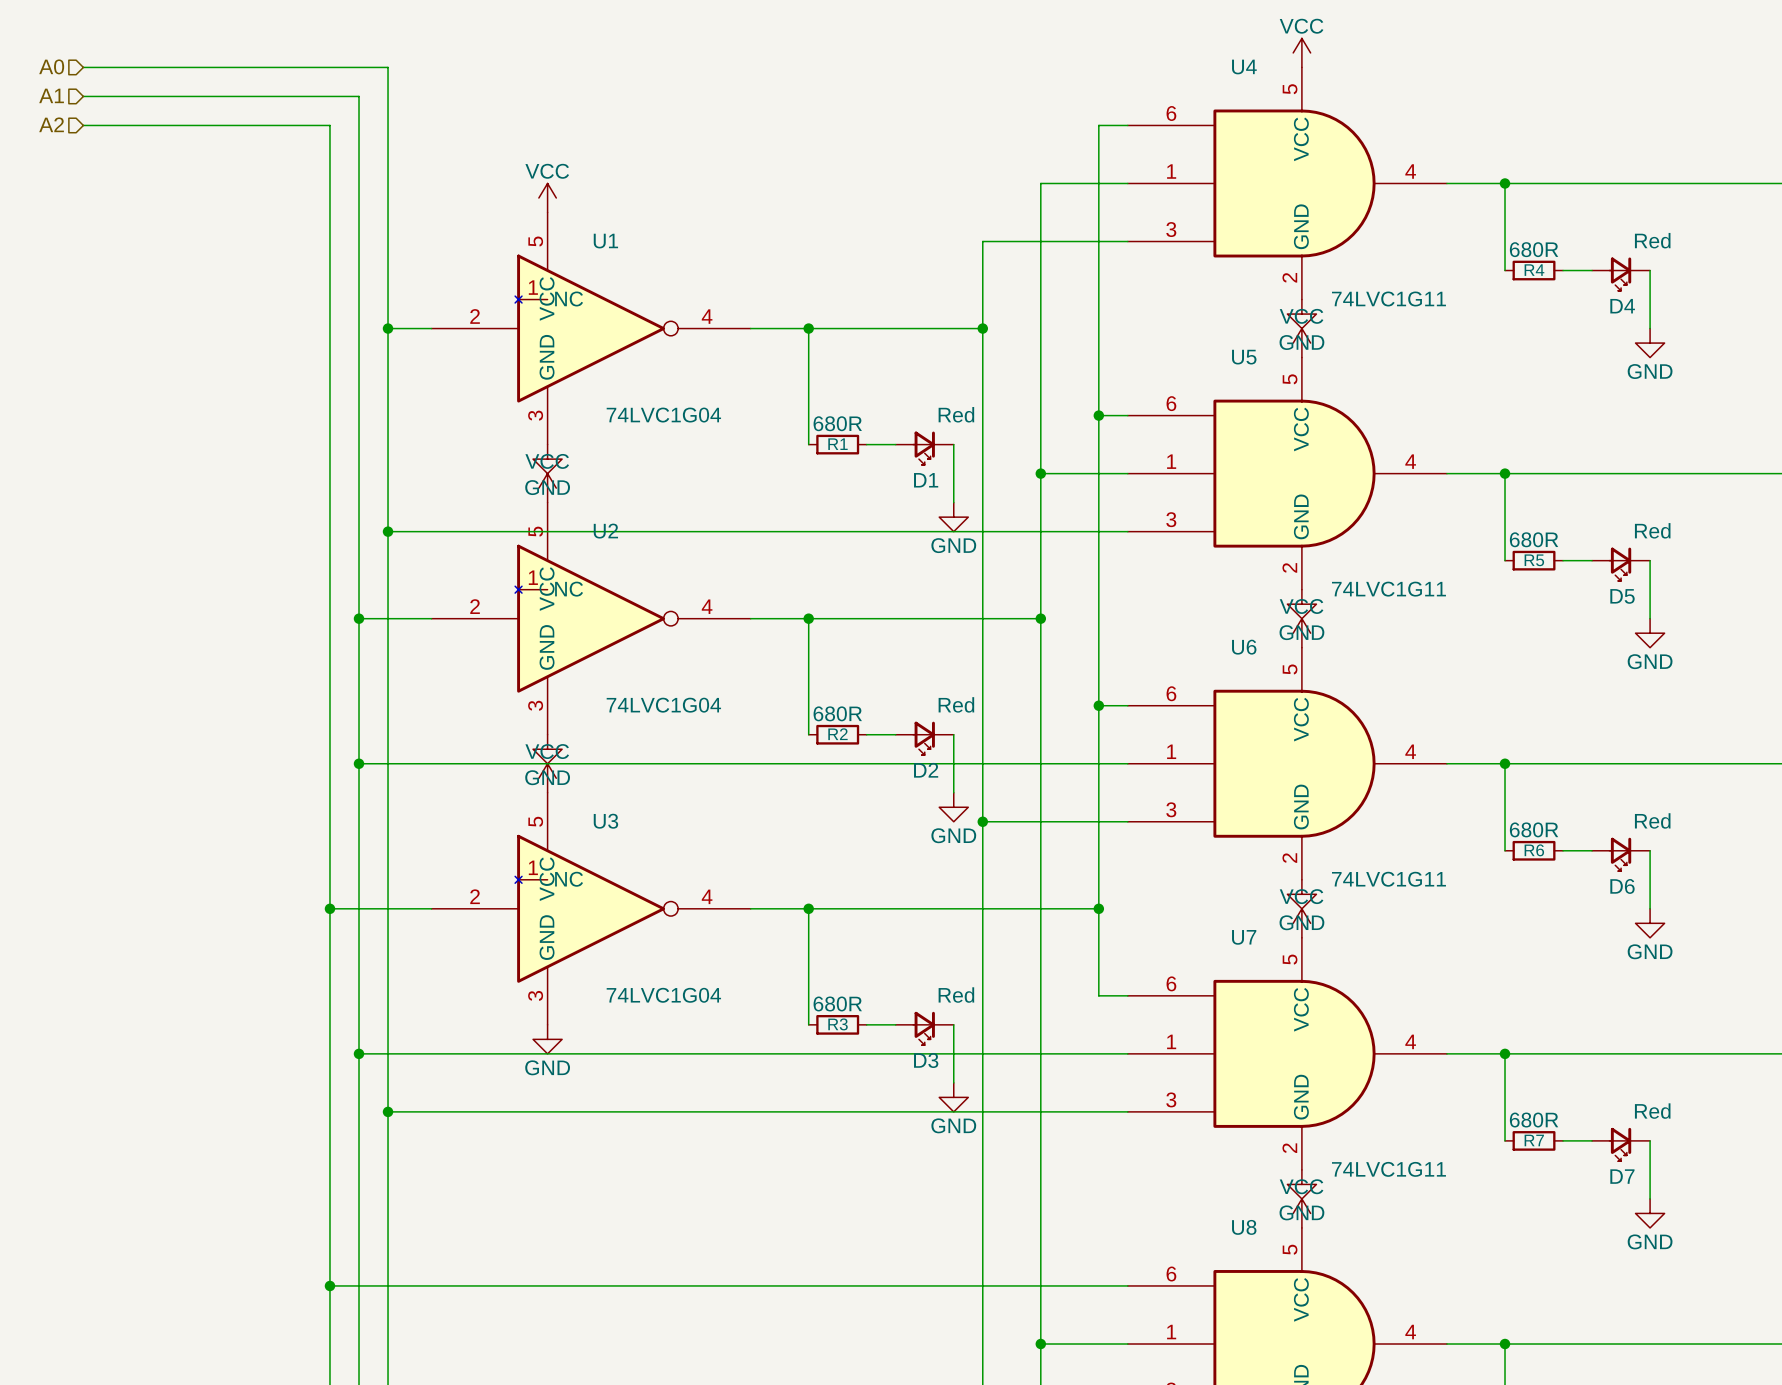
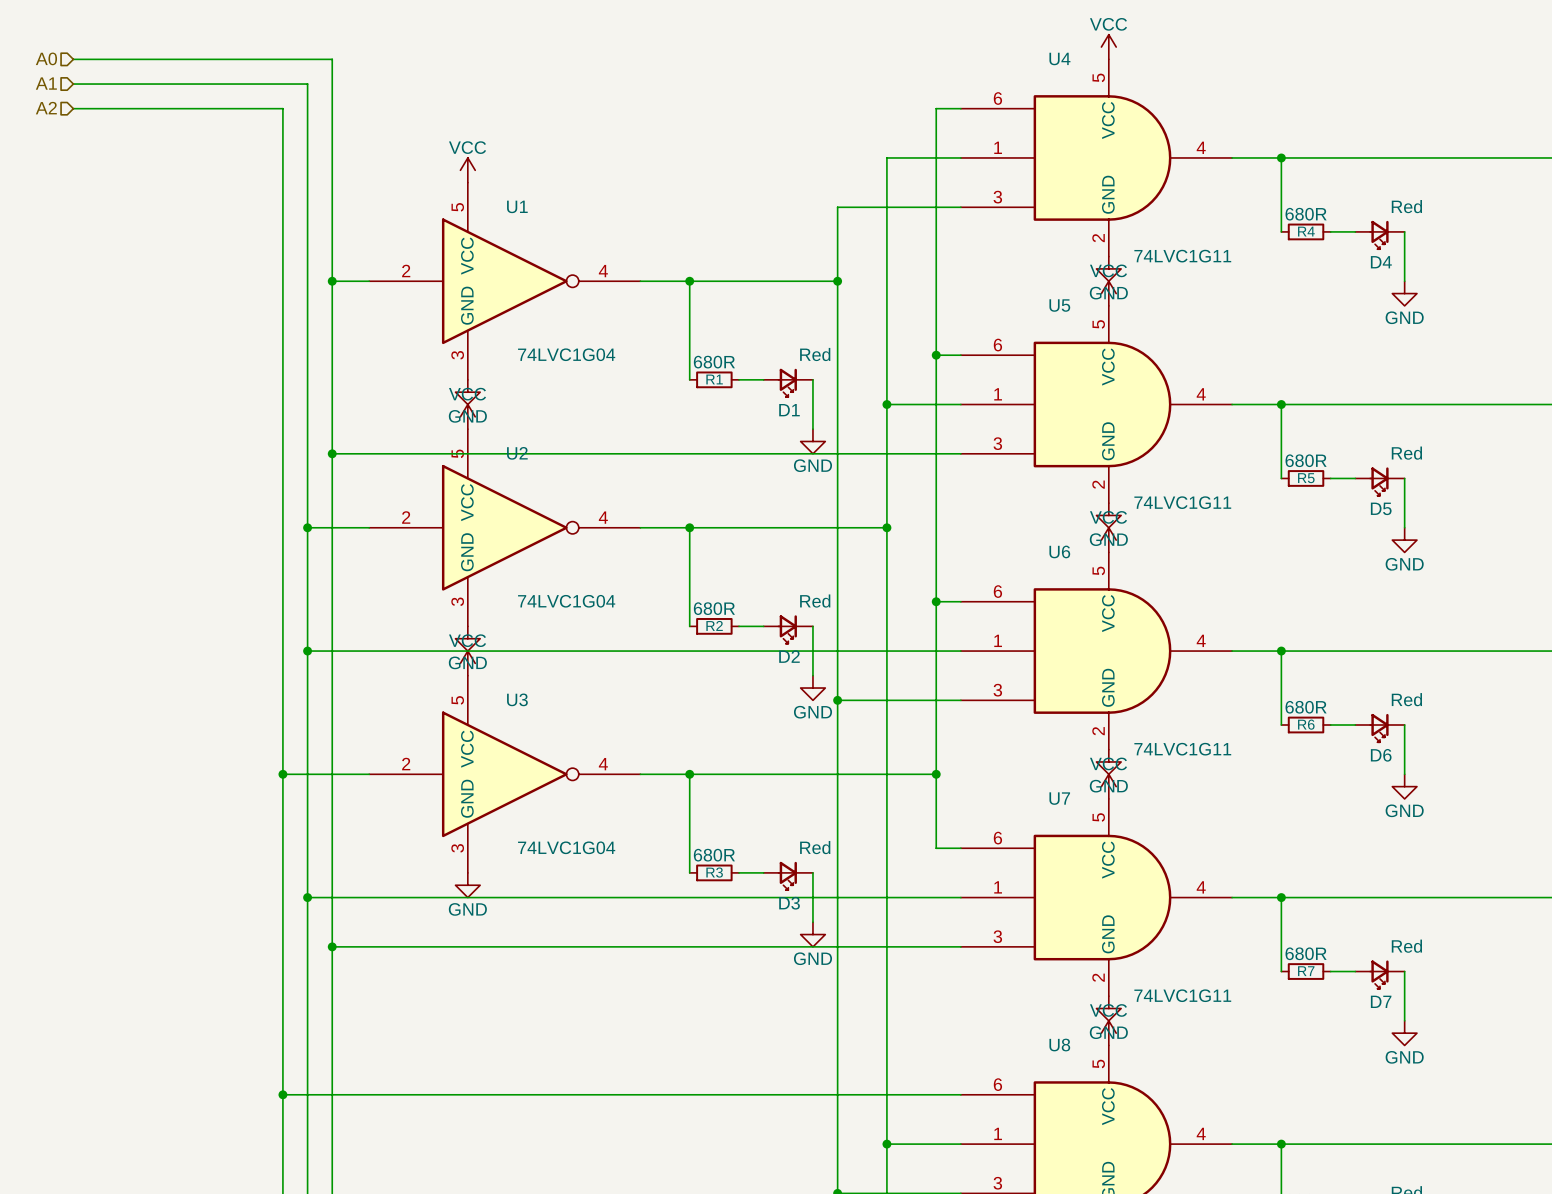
U1 symbol: [431, 212, 751, 445] -> [369, 182, 641, 380]
U2 symbol: [431, 502, 751, 735] -> [369, 429, 641, 627]
U3 symbol: [431, 792, 751, 1025] -> [369, 675, 641, 873]

